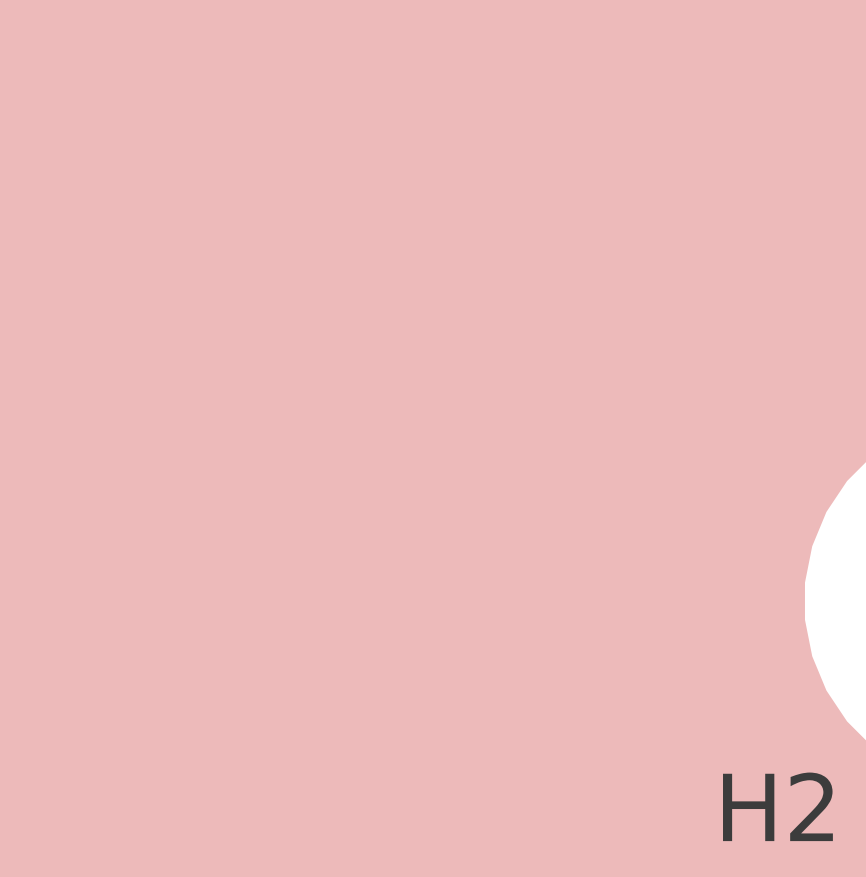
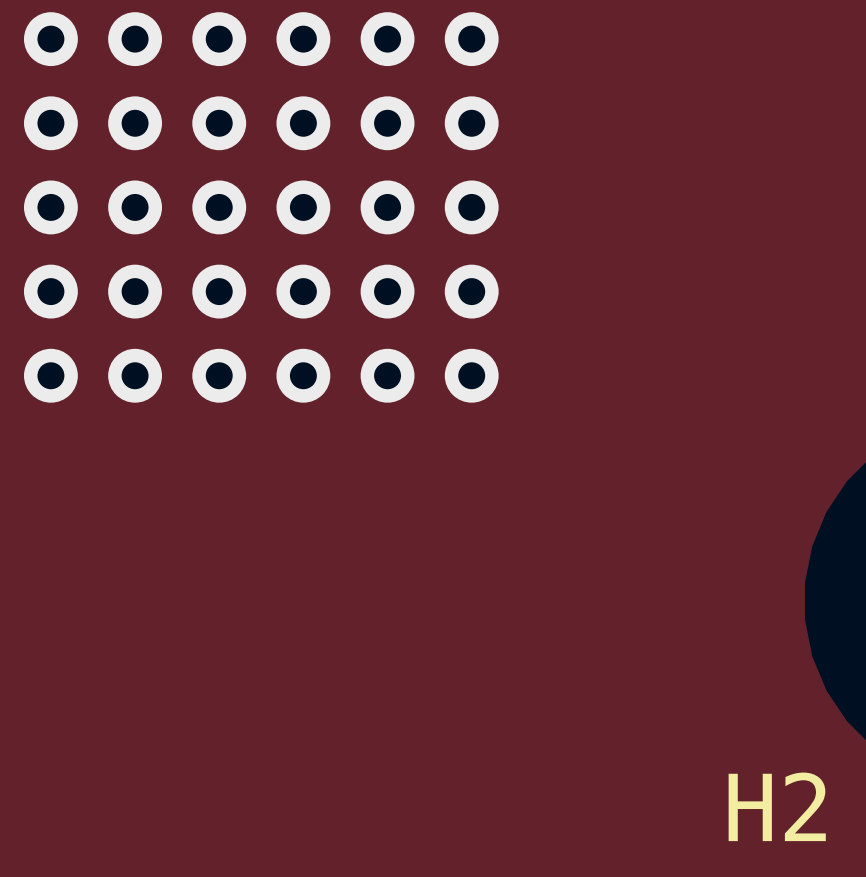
via: none -> (50, 39)
via: none -> (135, 39)
via: none -> (219, 39)
via: none -> (303, 39)
via: none -> (387, 39)
via: none -> (471, 39)
via: none -> (50, 123)
via: none -> (135, 123)
via: none -> (219, 123)
via: none -> (303, 123)
via: none -> (387, 123)
via: none -> (471, 123)
via: none -> (50, 207)
via: none -> (135, 207)
via: none -> (219, 207)
via: none -> (303, 207)
via: none -> (387, 207)
via: none -> (471, 207)
via: none -> (50, 291)
via: none -> (135, 291)
via: none -> (219, 291)
via: none -> (303, 291)
via: none -> (387, 291)
via: none -> (471, 291)
via: none -> (50, 375)
via: none -> (135, 375)
via: none -> (219, 375)
via: none -> (303, 375)
via: none -> (387, 375)
via: none -> (471, 375)

